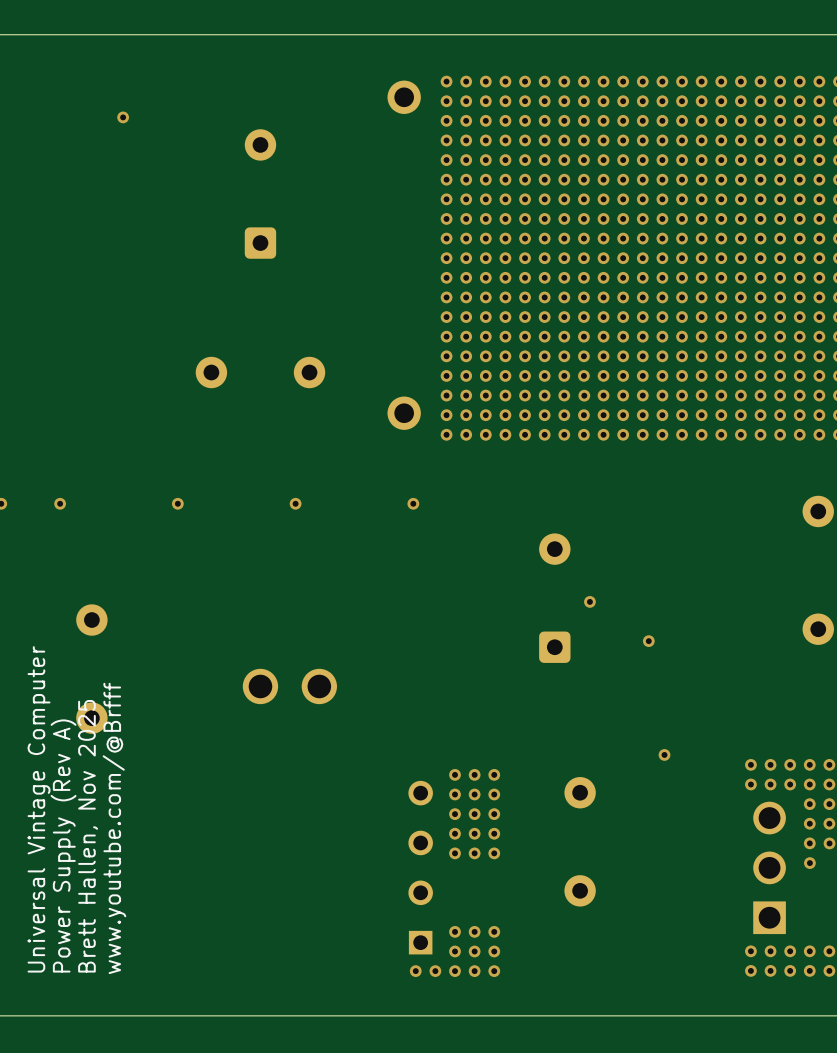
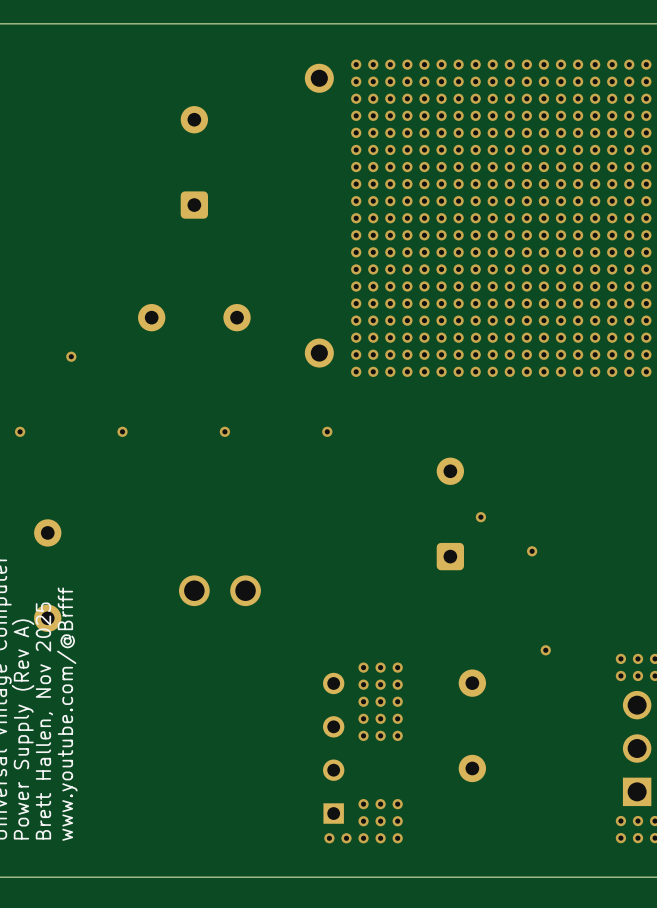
via: (123, 117) -> none
via: none -> (71, 356)

